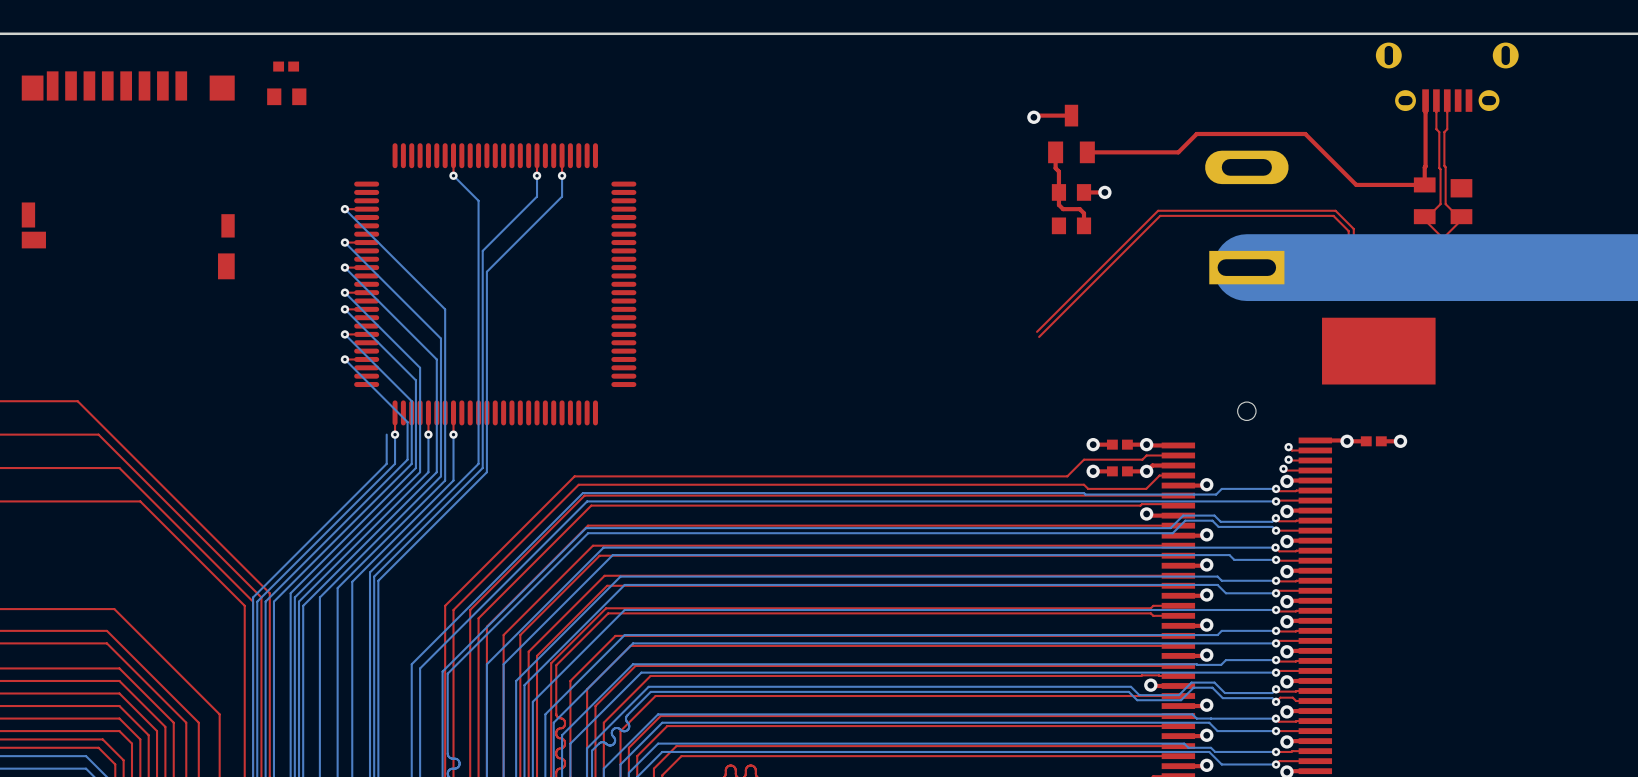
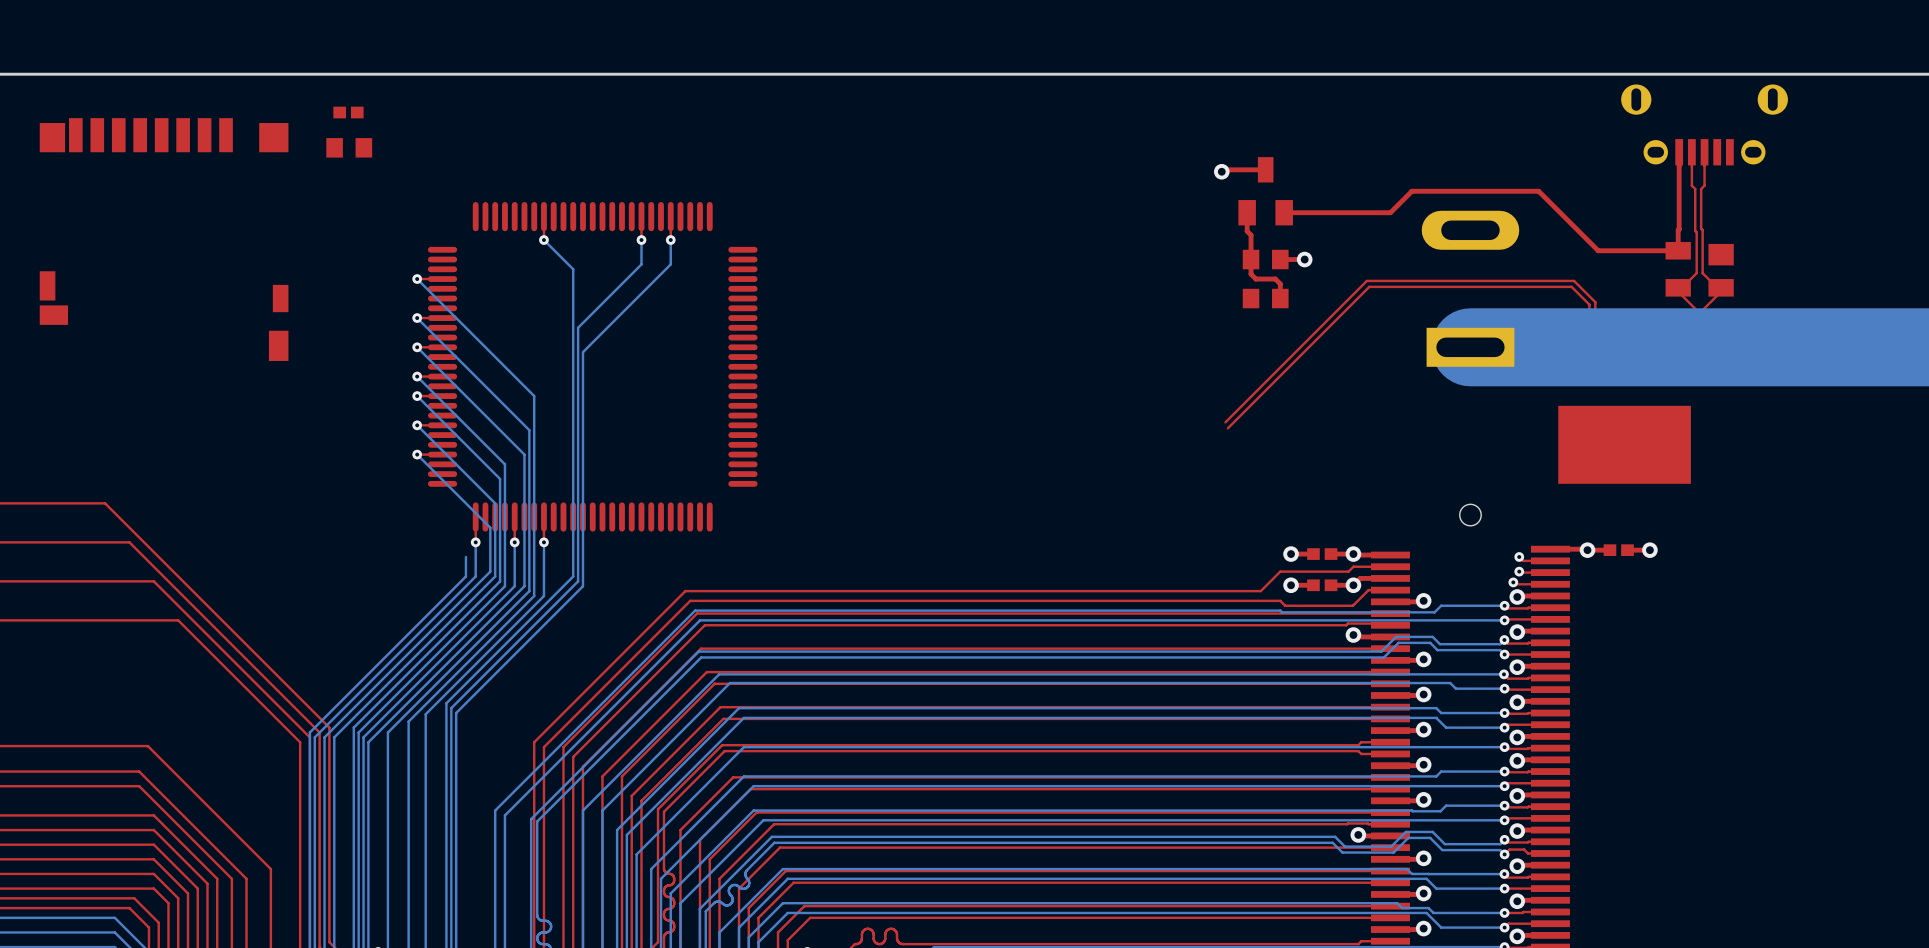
bottom track: (386, 434) (386, 447) -> none

